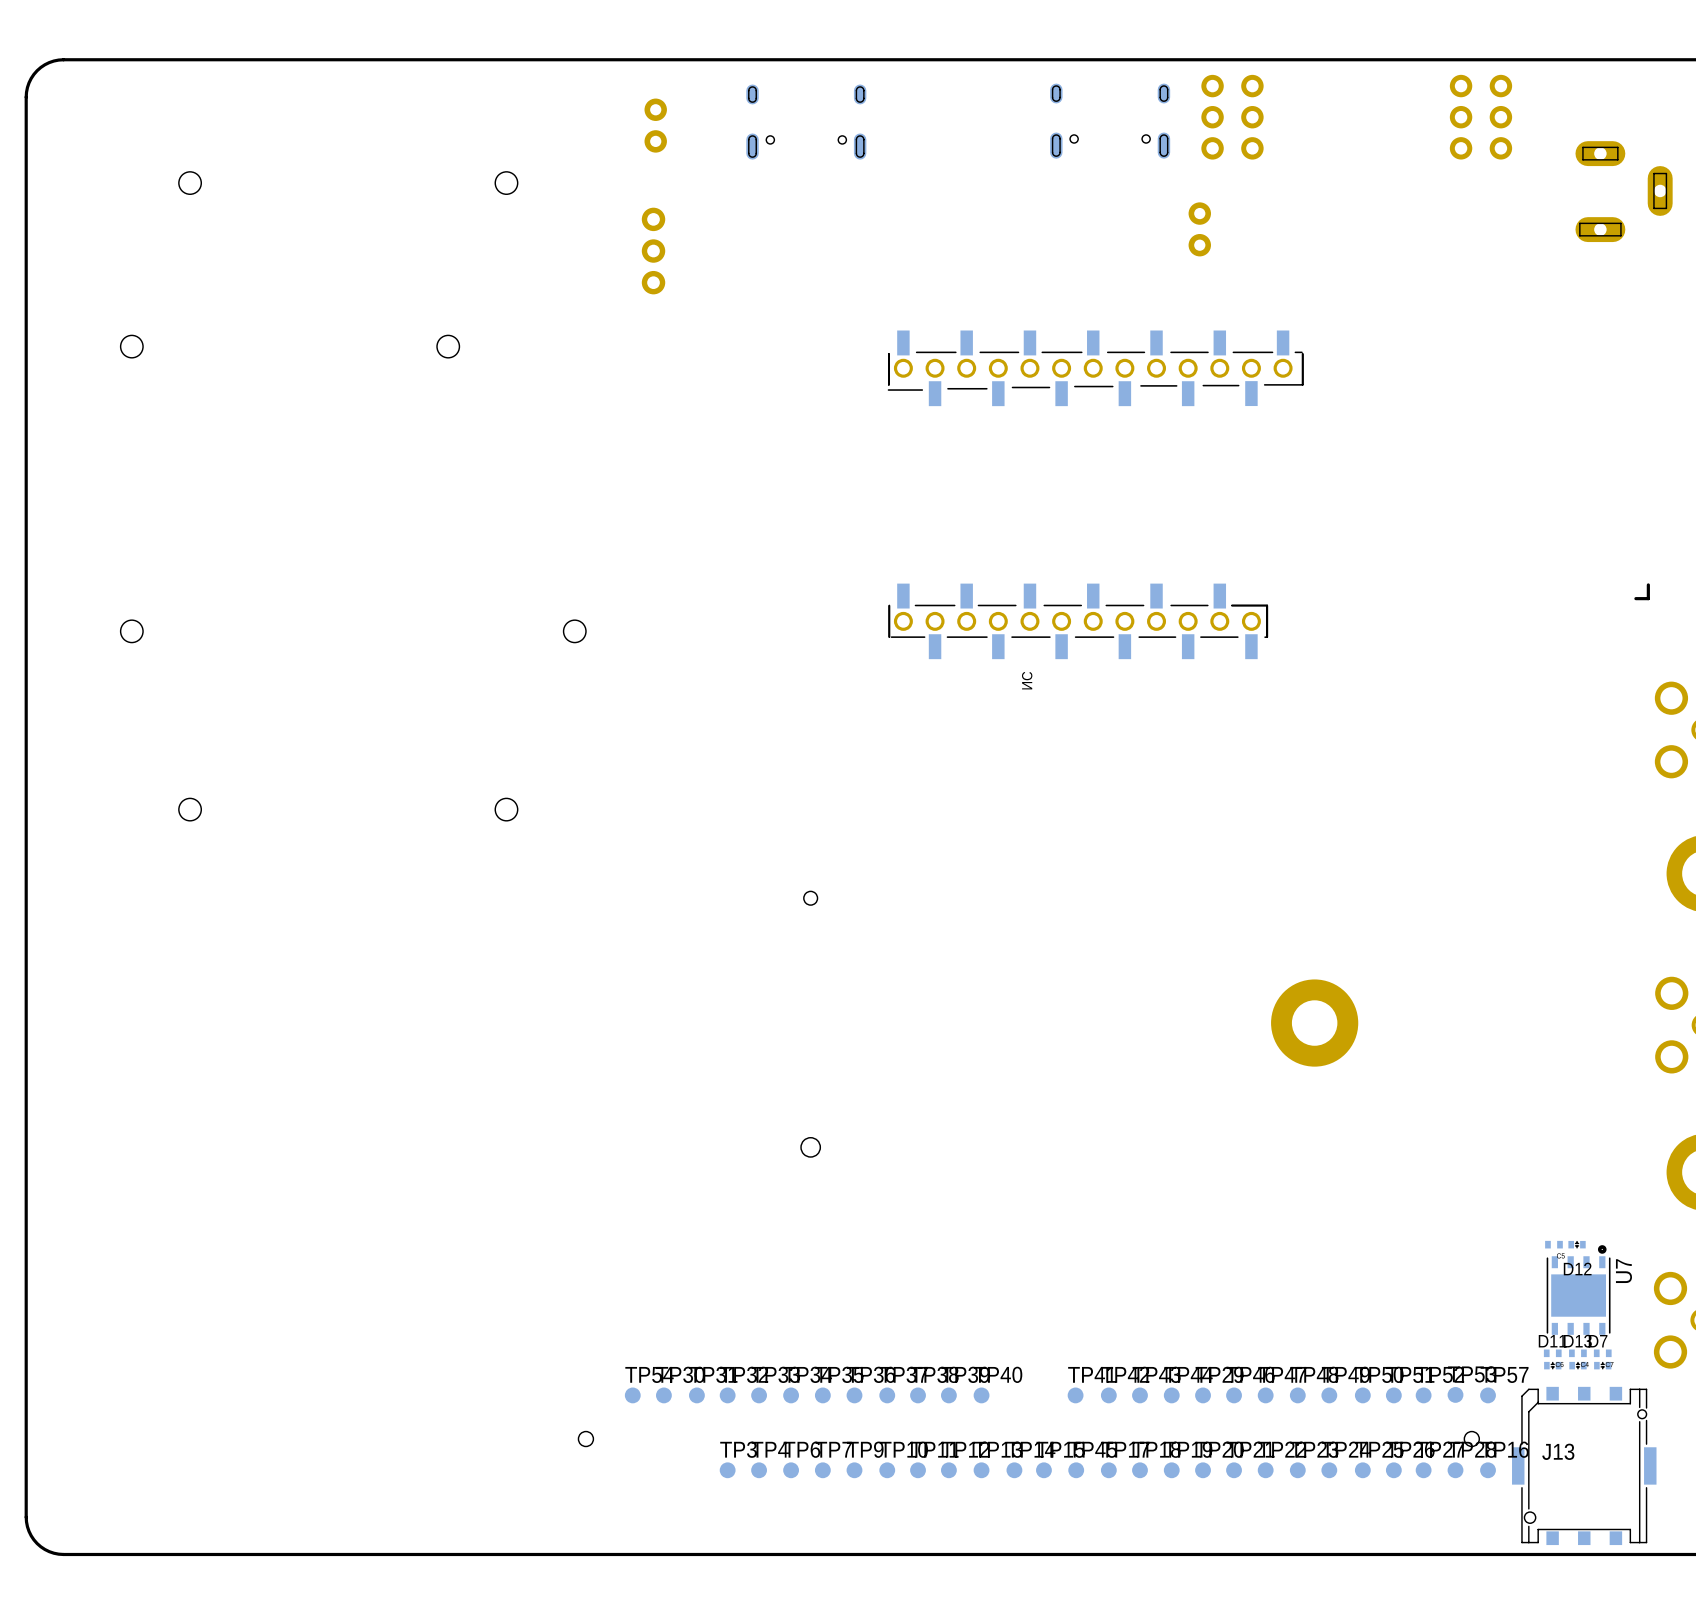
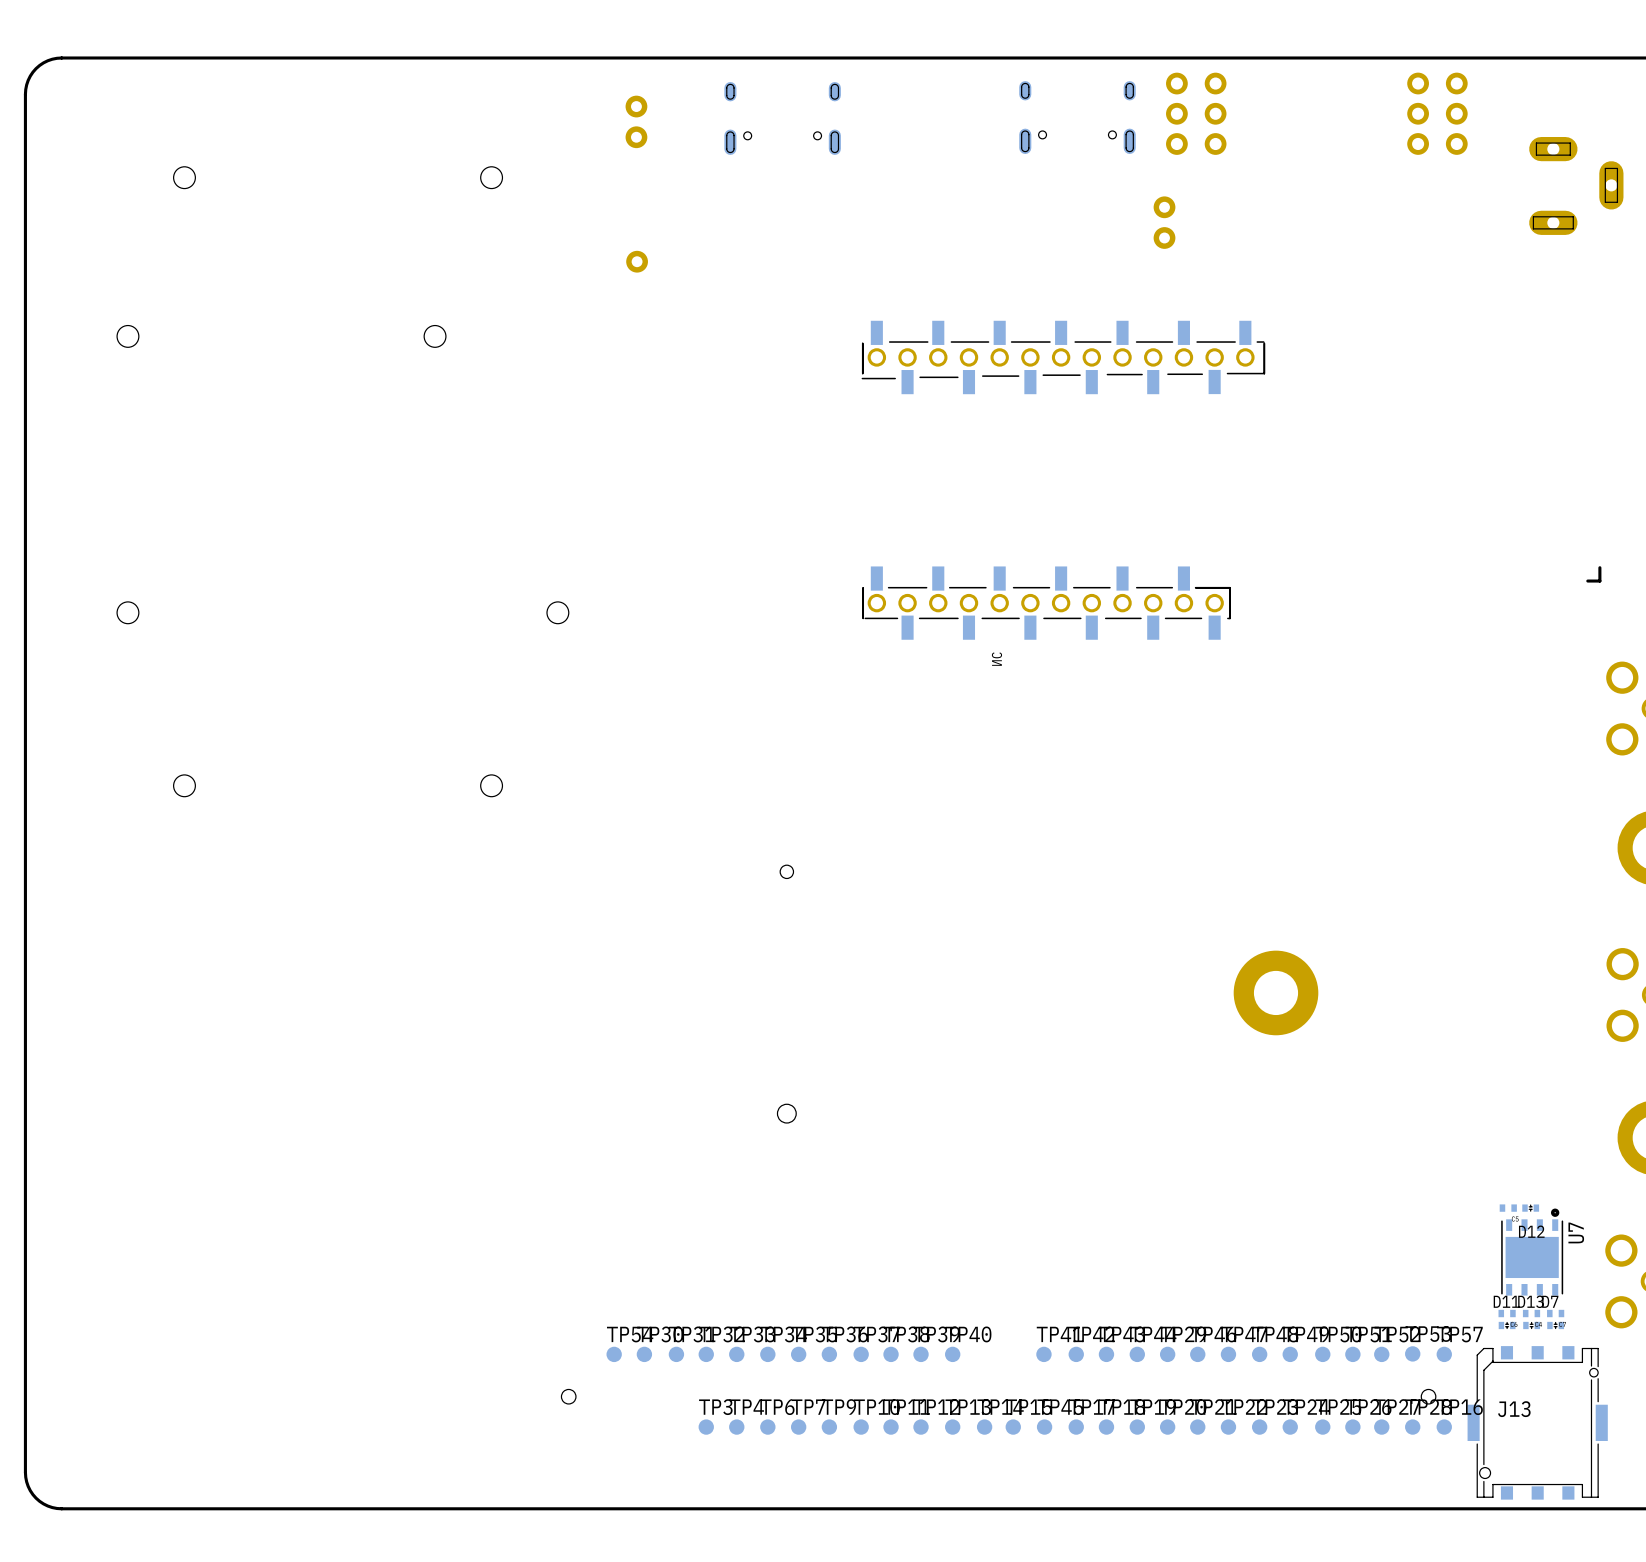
part: (653, 251) -> none
part: none -> (637, 261)

